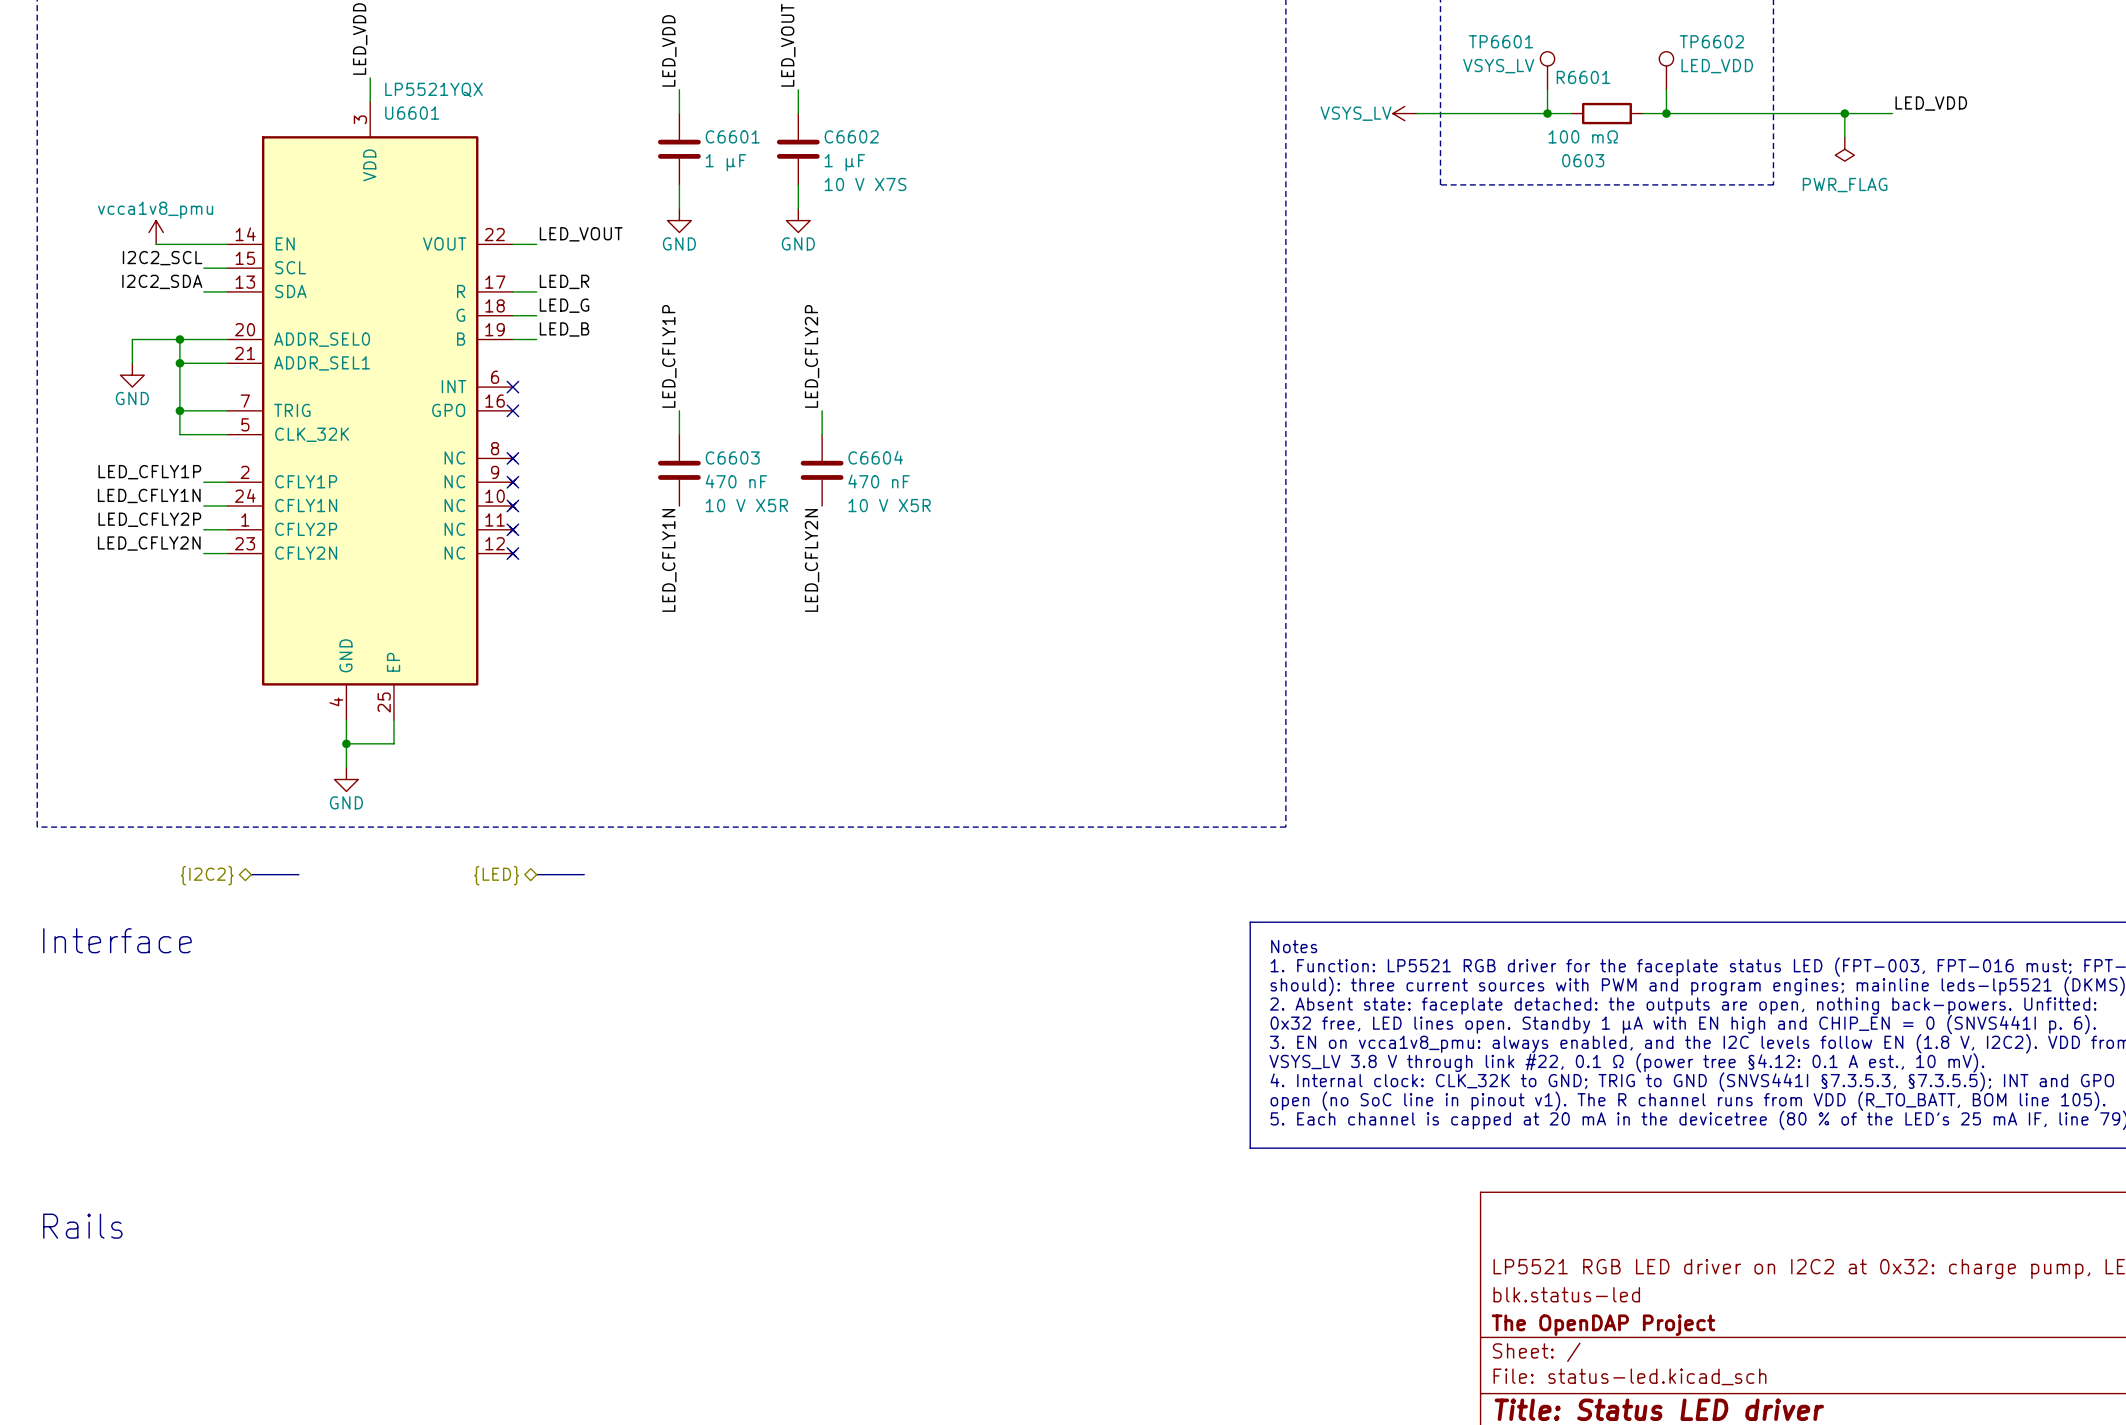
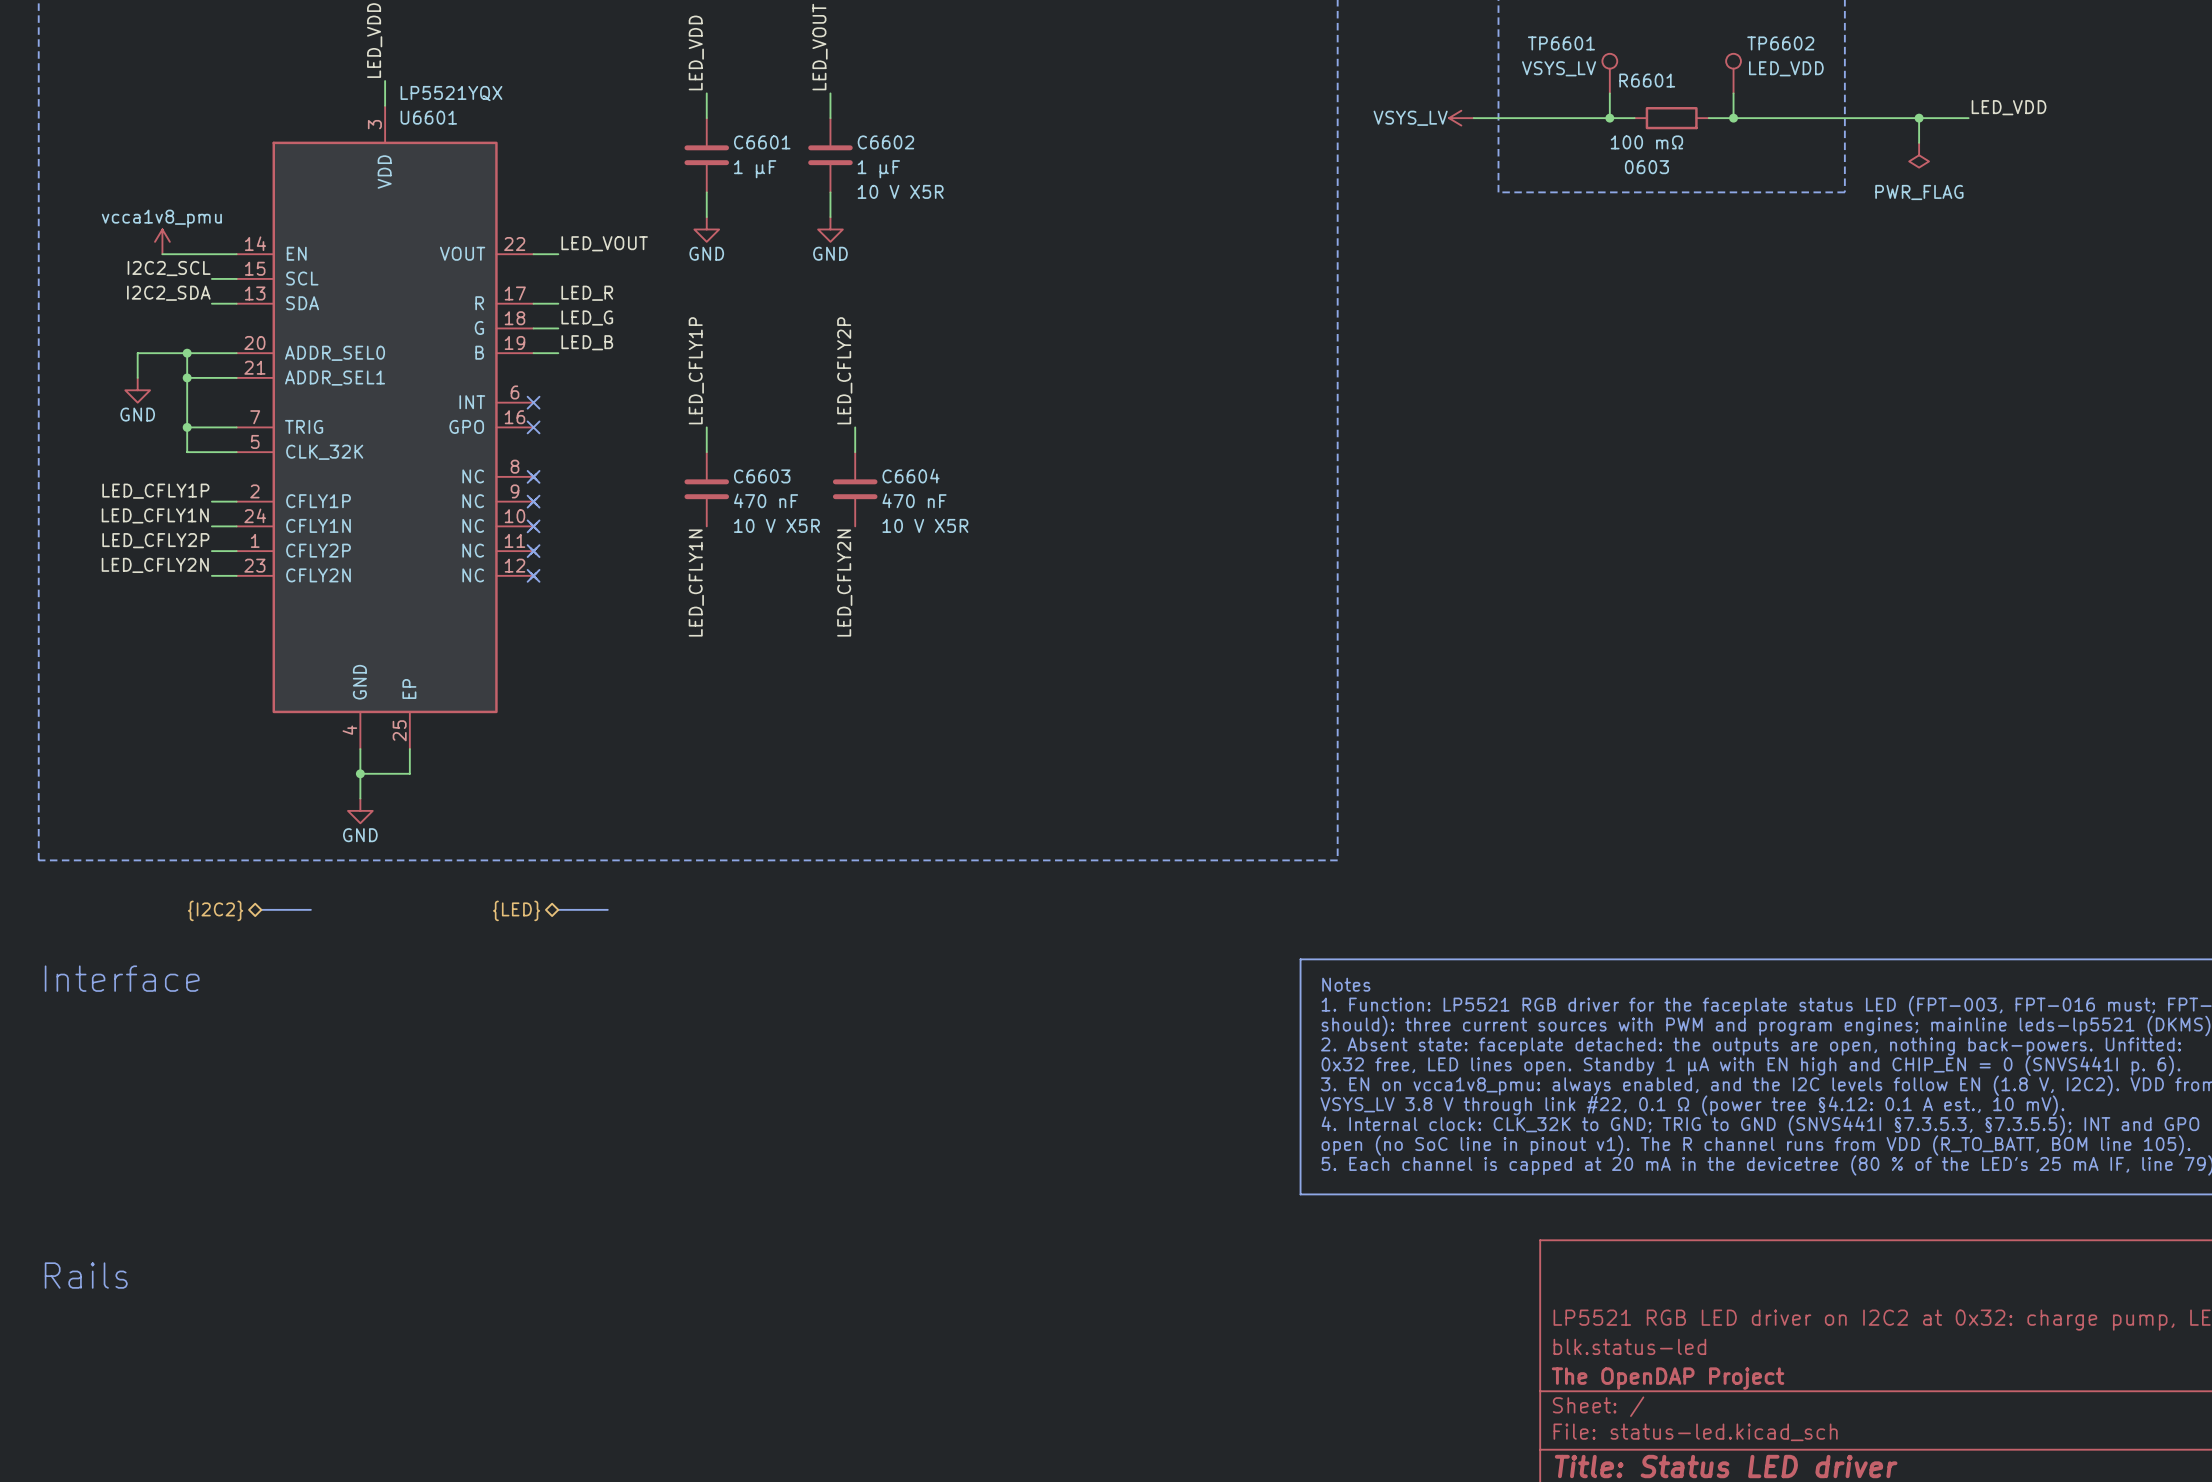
C6602 text: 10 V X7S (865, 184) -> 10 V X5R (900, 191)

